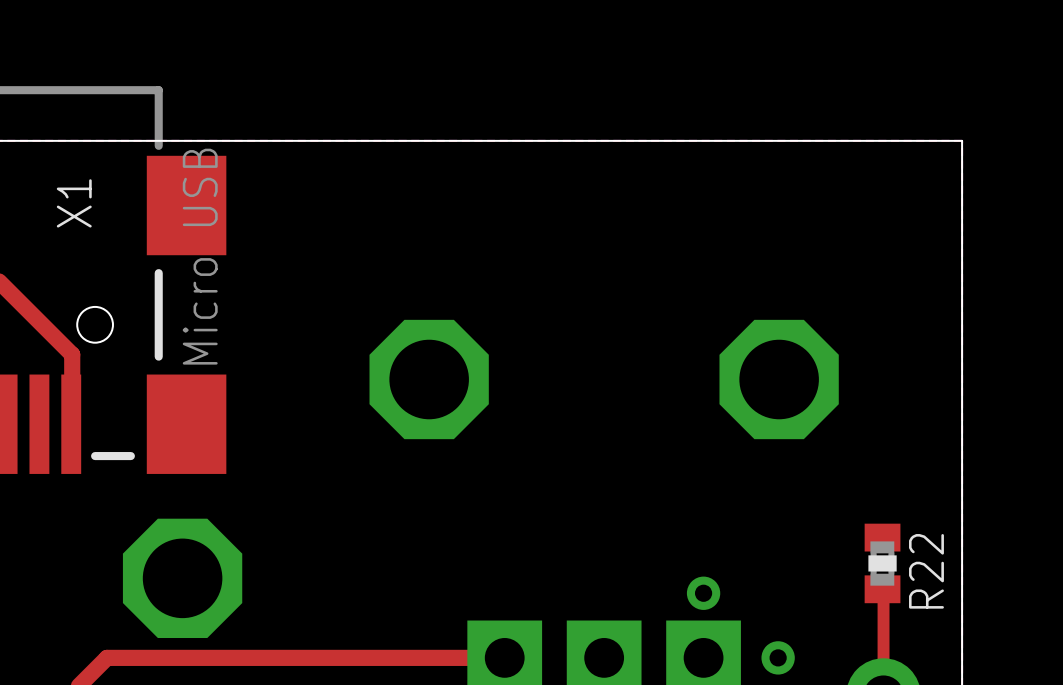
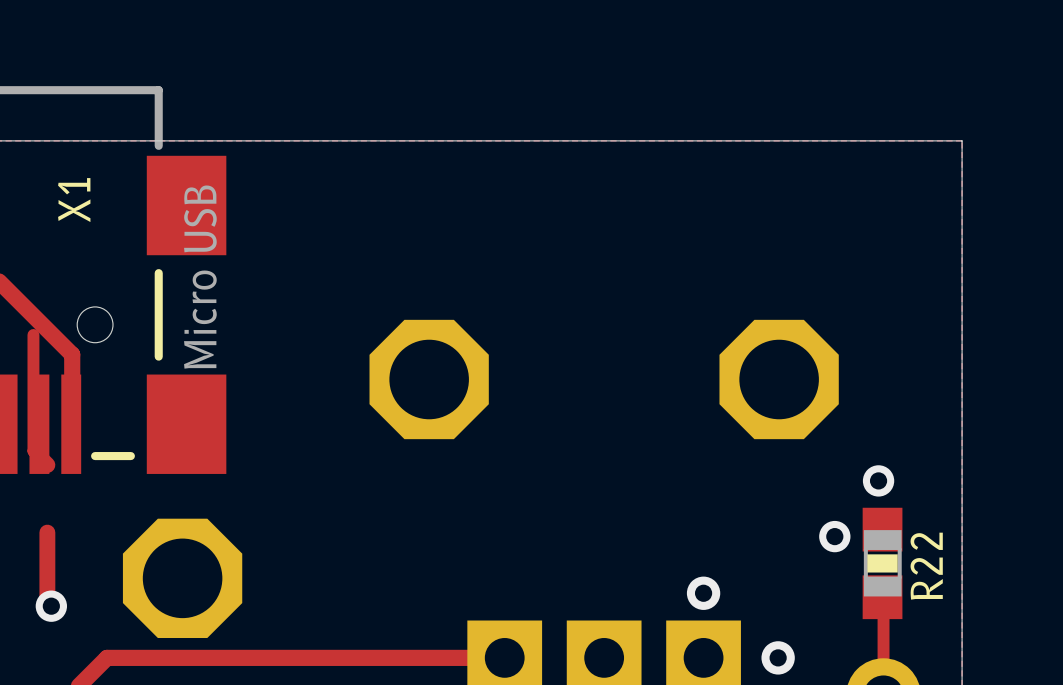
top track: none -> (33, 334) (33, 451) (47, 465) (41, 459)
via: none -> (878, 480)
R22 footprint: [864, 523, 901, 604] -> [862, 507, 903, 620]
top track: none -> (47, 532) (47, 602) (51, 606)
via: none -> (834, 536)
via: none -> (51, 606)

